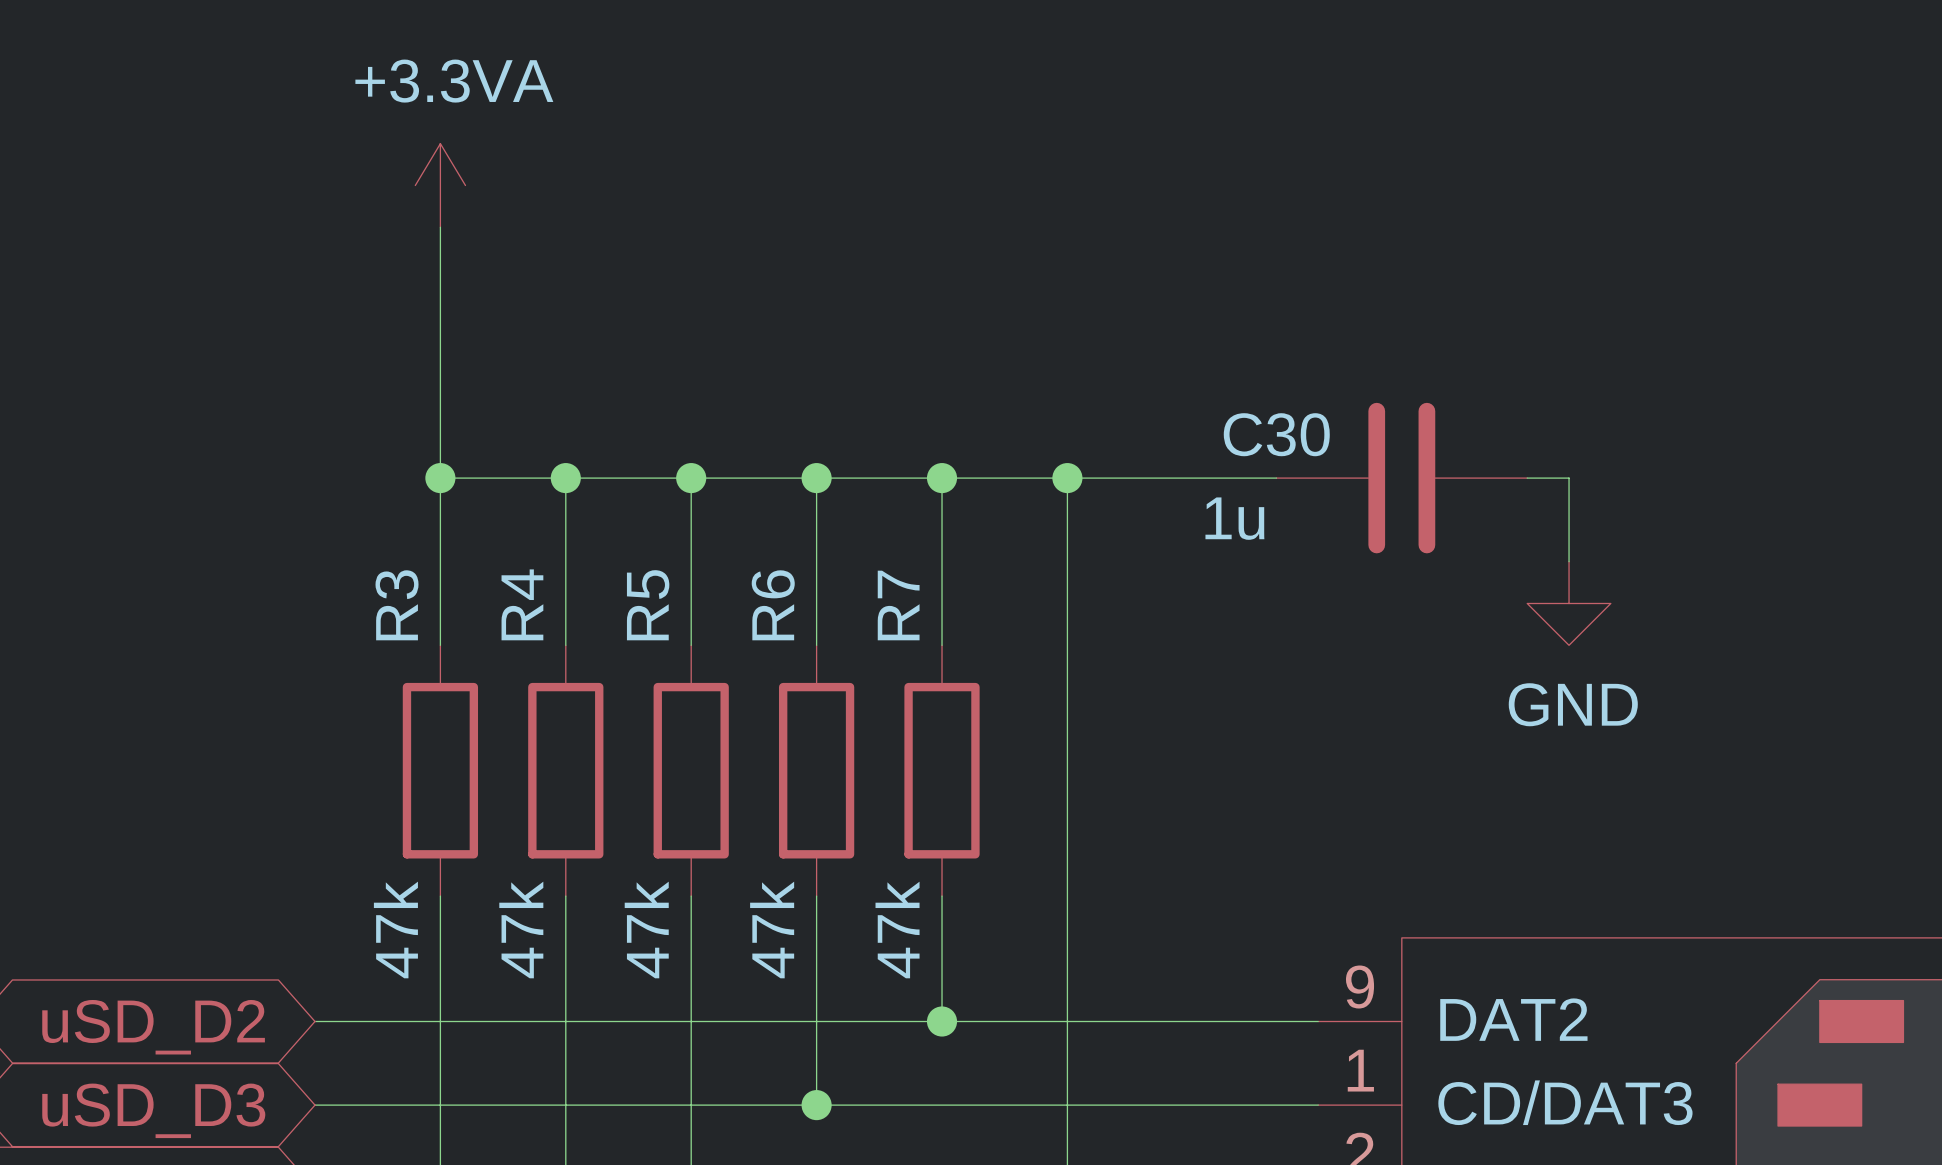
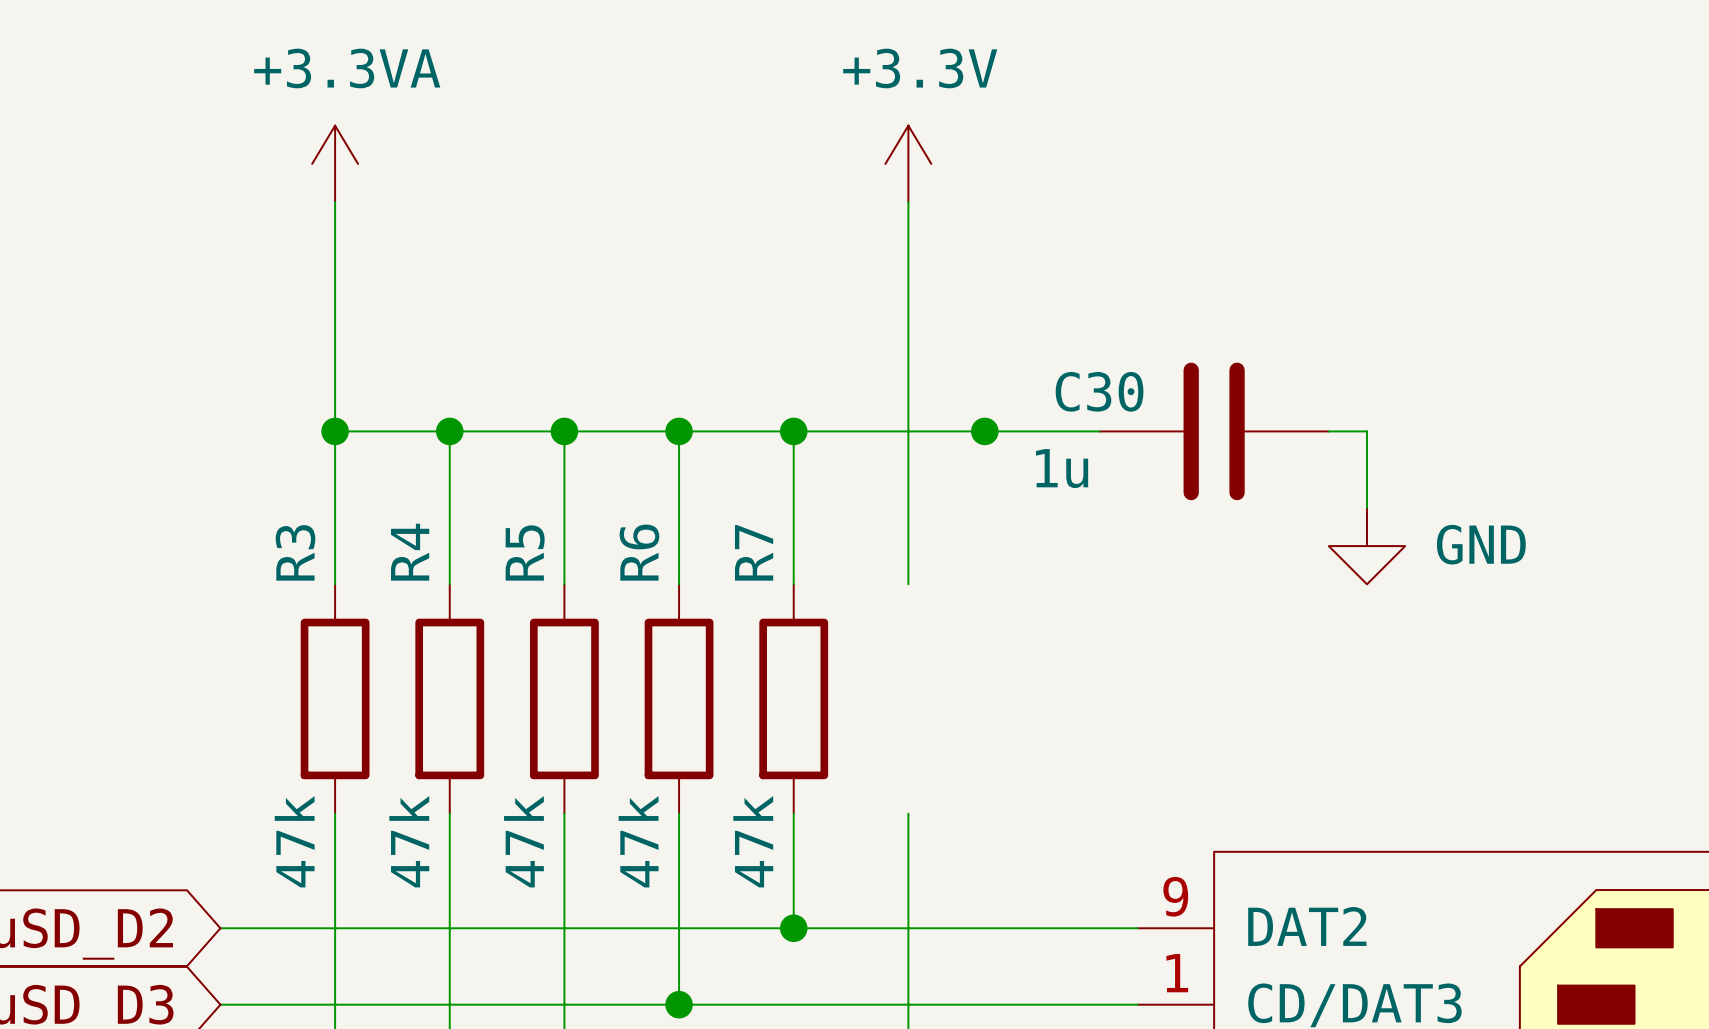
power symbol: none -> +3.3V (908, 163)
junction position: (1067, 478) -> (984, 431)
wire: (1067, 645) (1067, 896) -> (908, 202) (908, 431)
power symbol text position: GND (1573, 704) -> GND (1481, 544)

